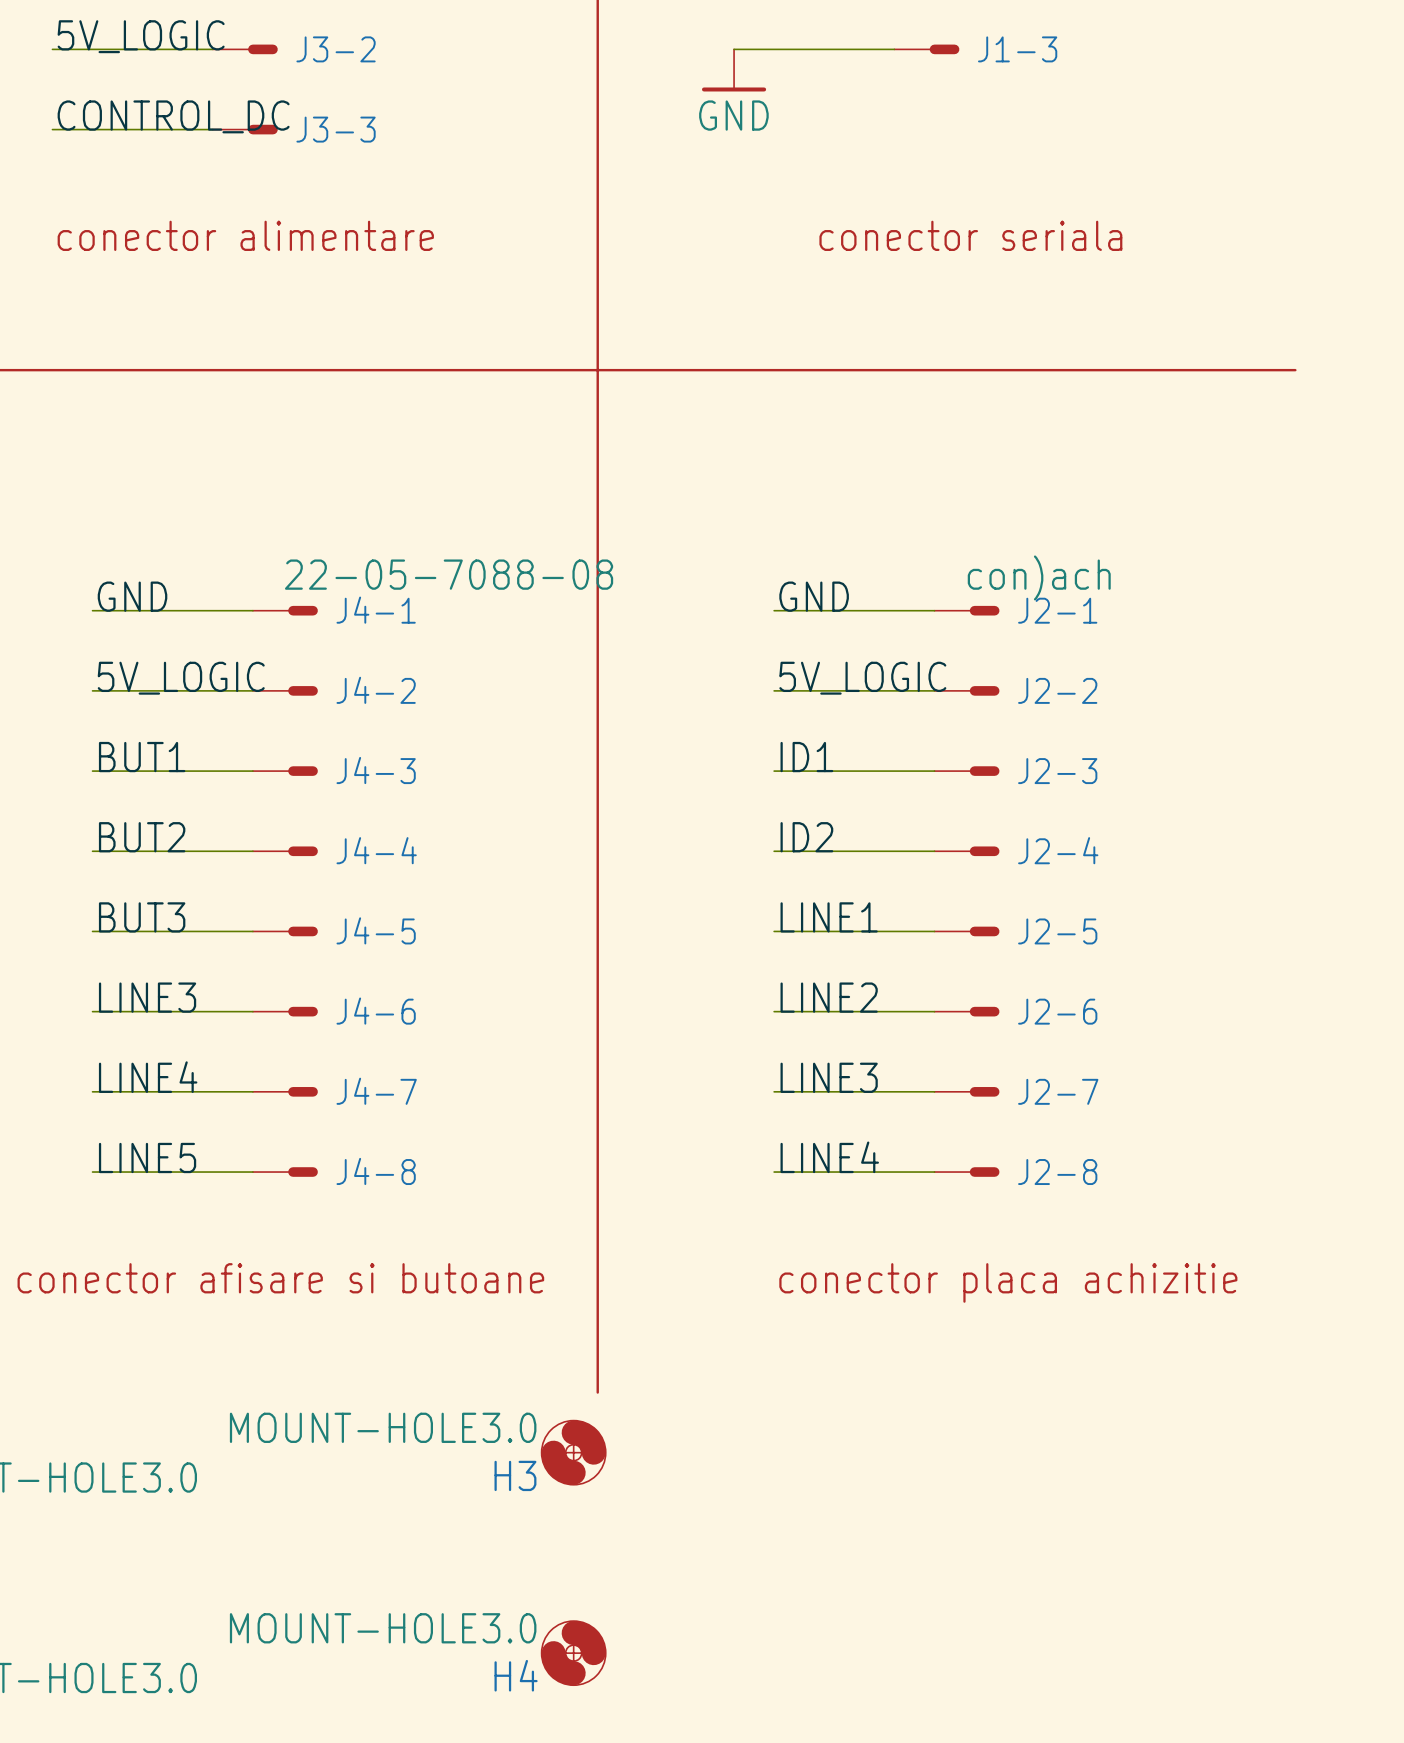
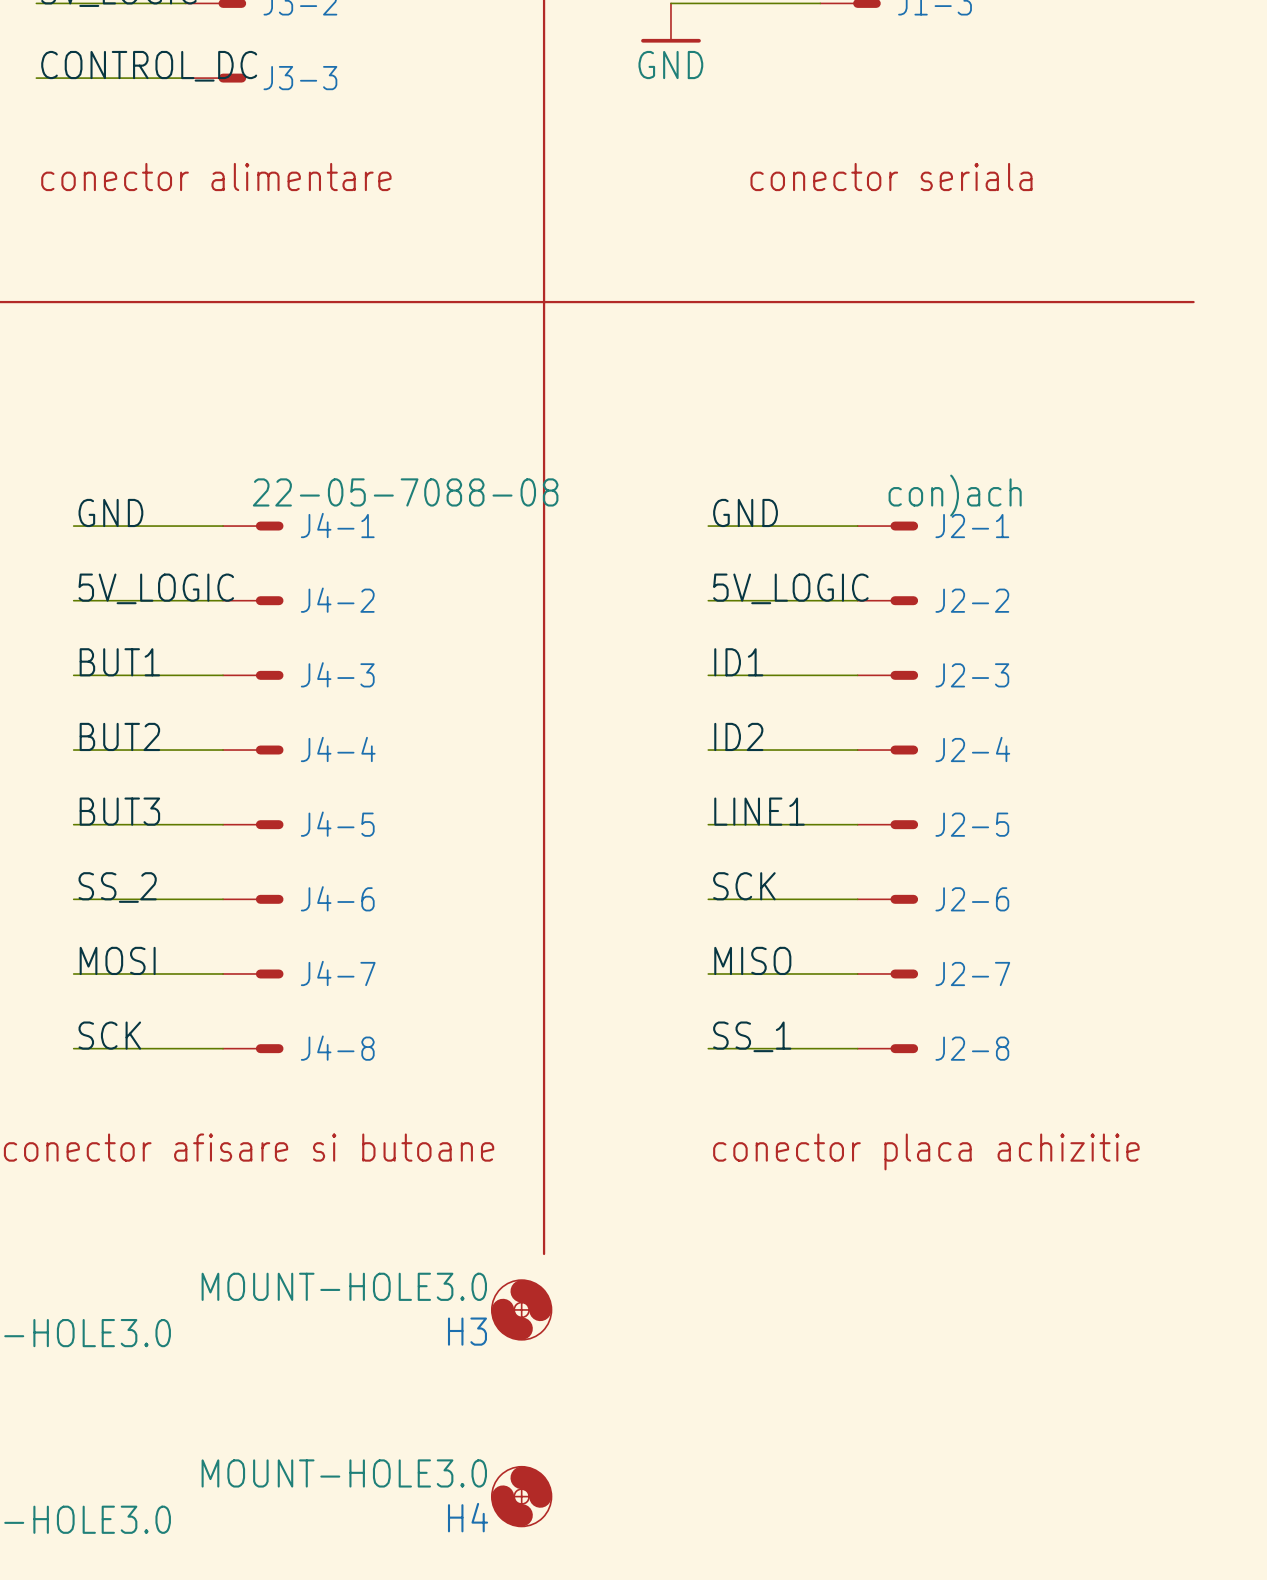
label: LINE3 (147, 997) -> SS_2 (117, 887)
label: LINE2 (829, 997) -> SCK (744, 886)
label: LINE4 (148, 1077) -> MOSI (117, 960)
label: LINE3 (829, 1077) -> MISO (752, 960)
label: LINE5 (147, 1157) -> SCK (109, 1035)
label: LINE4 (829, 1157) -> SS_1 (752, 1036)

